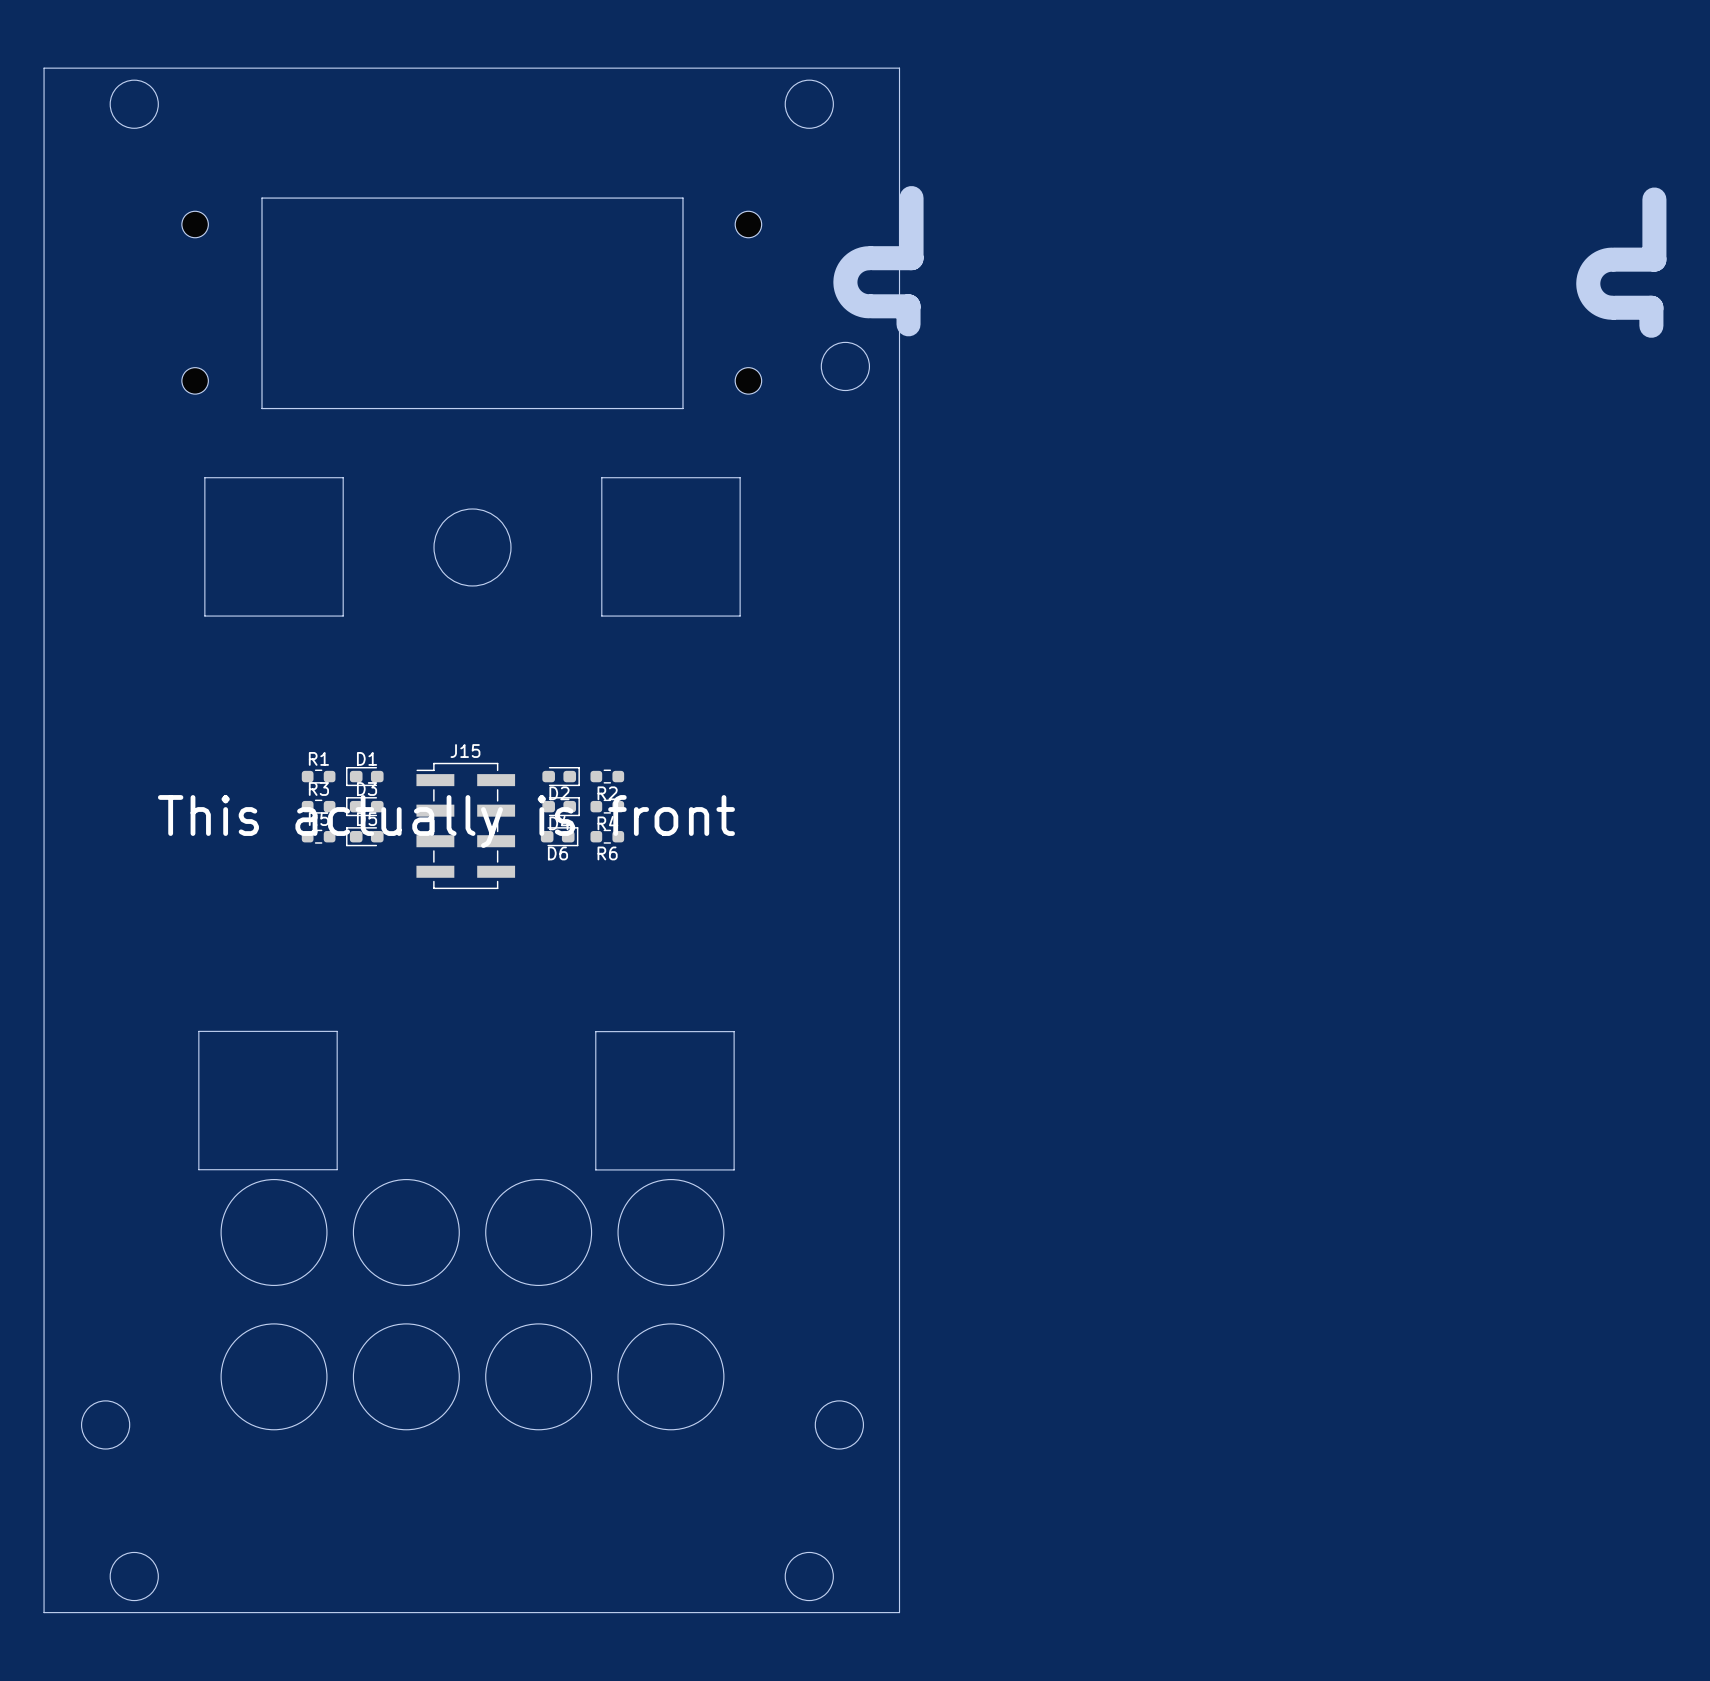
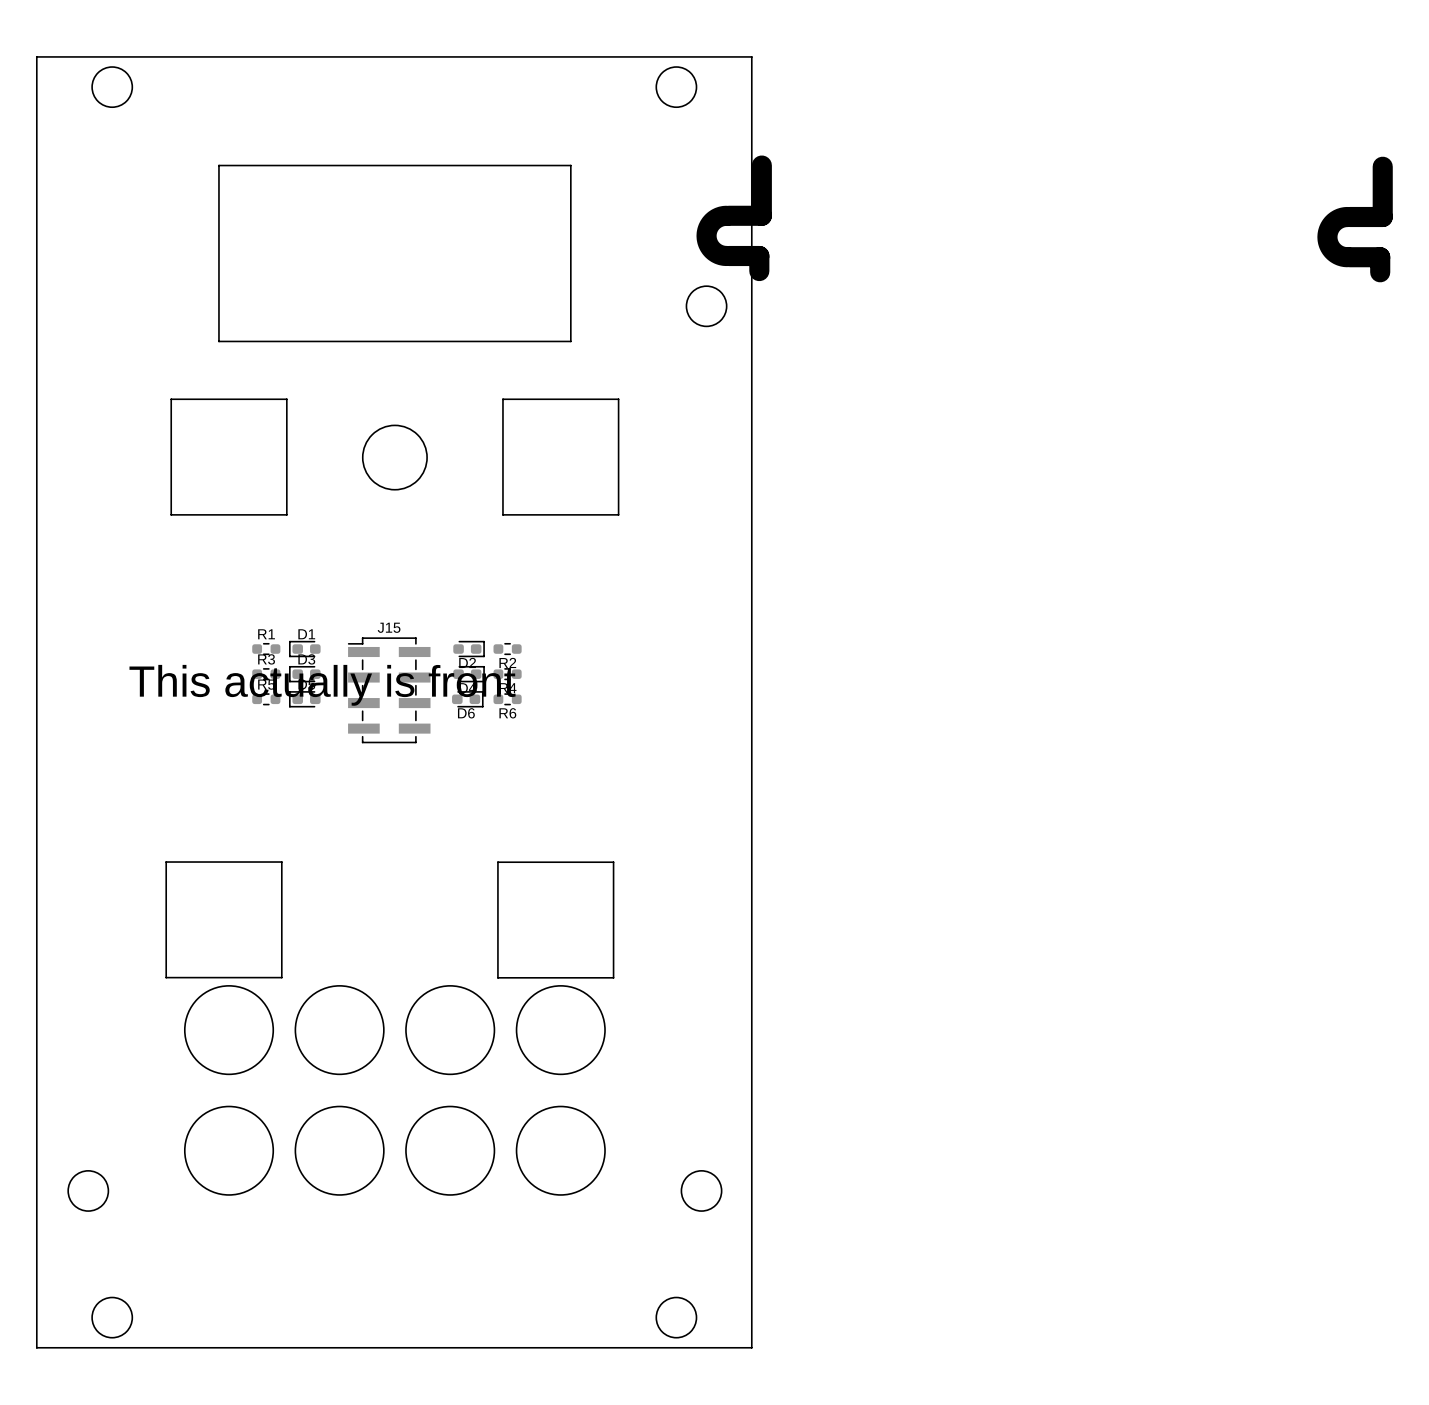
part: (195, 224) -> none
part: (748, 224) -> none
part: (195, 380) -> none
part: (748, 380) -> none

